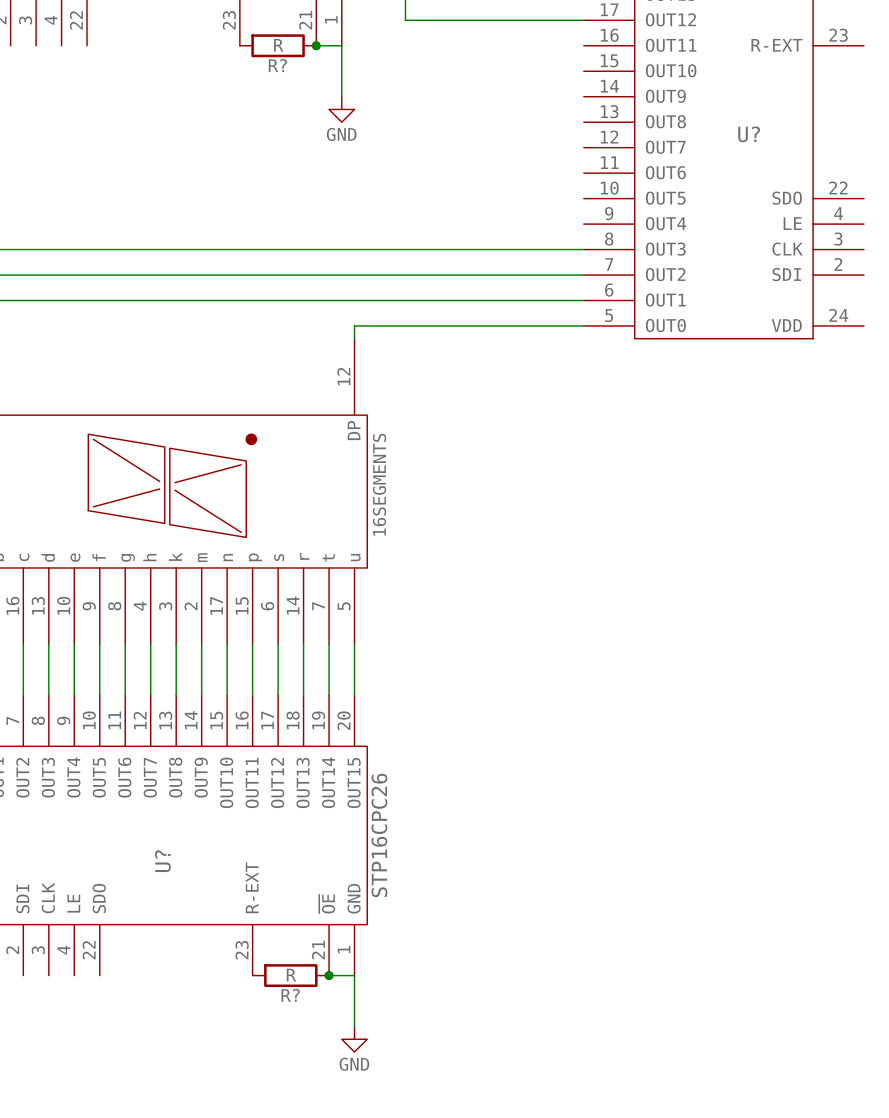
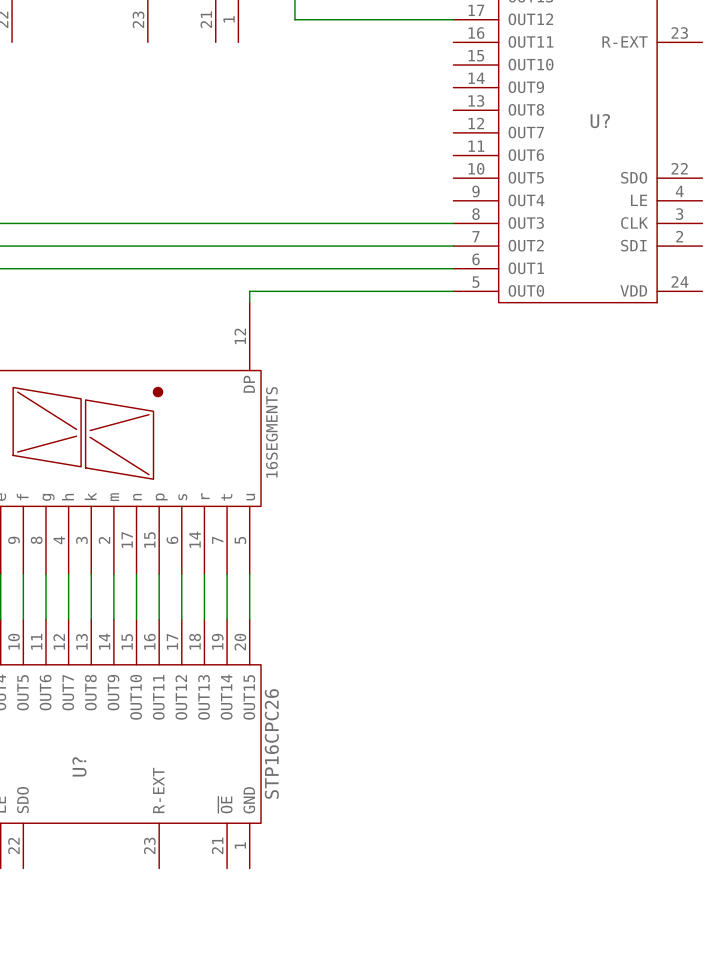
R?: R (278, 45) -> none
wire: (316, 45) (341, 45) (341, 96) -> none
junction: (316, 45) -> none
power symbol: GND (341, 109) -> none
R?: R (290, 975) -> none
wire: (329, 975) (354, 975) (354, 1026) -> none
junction: (329, 975) -> none
power symbol: GND (354, 1039) -> none

